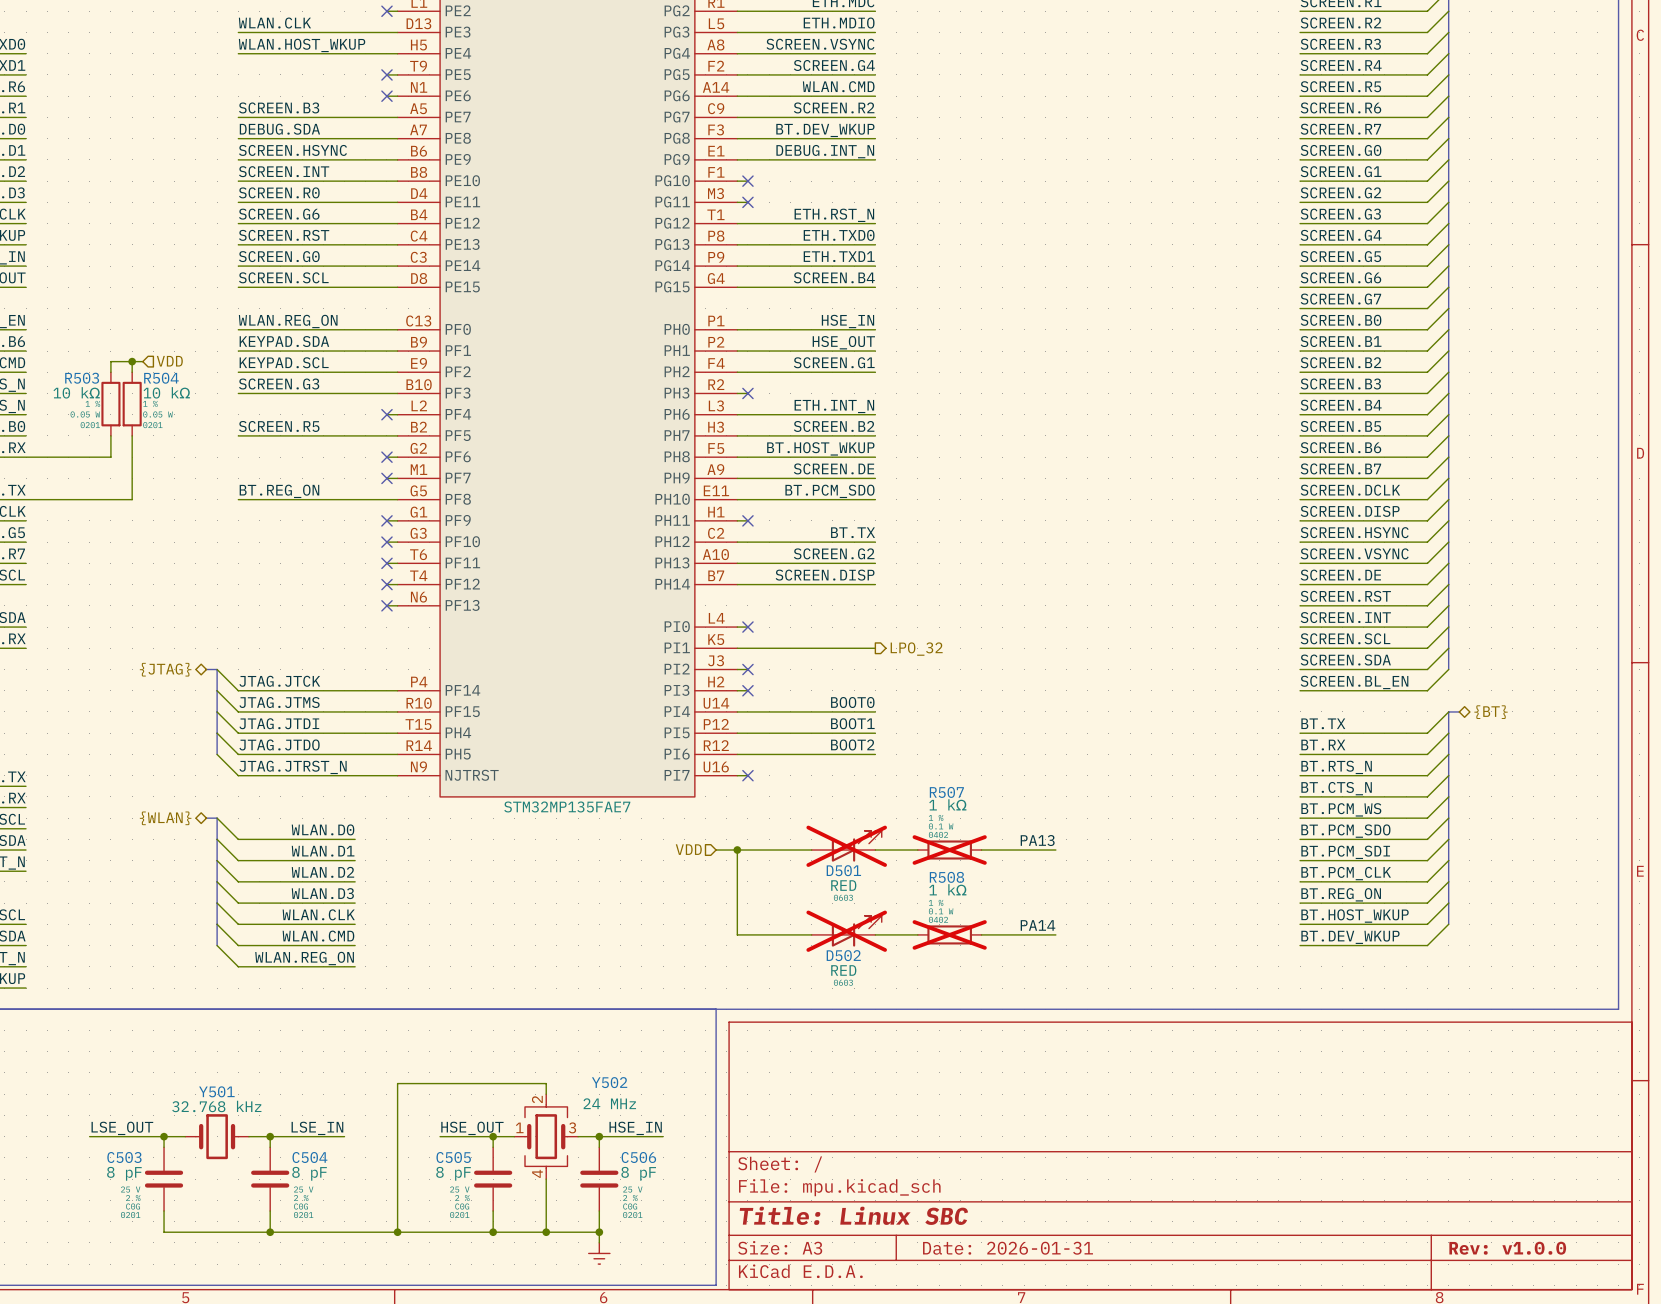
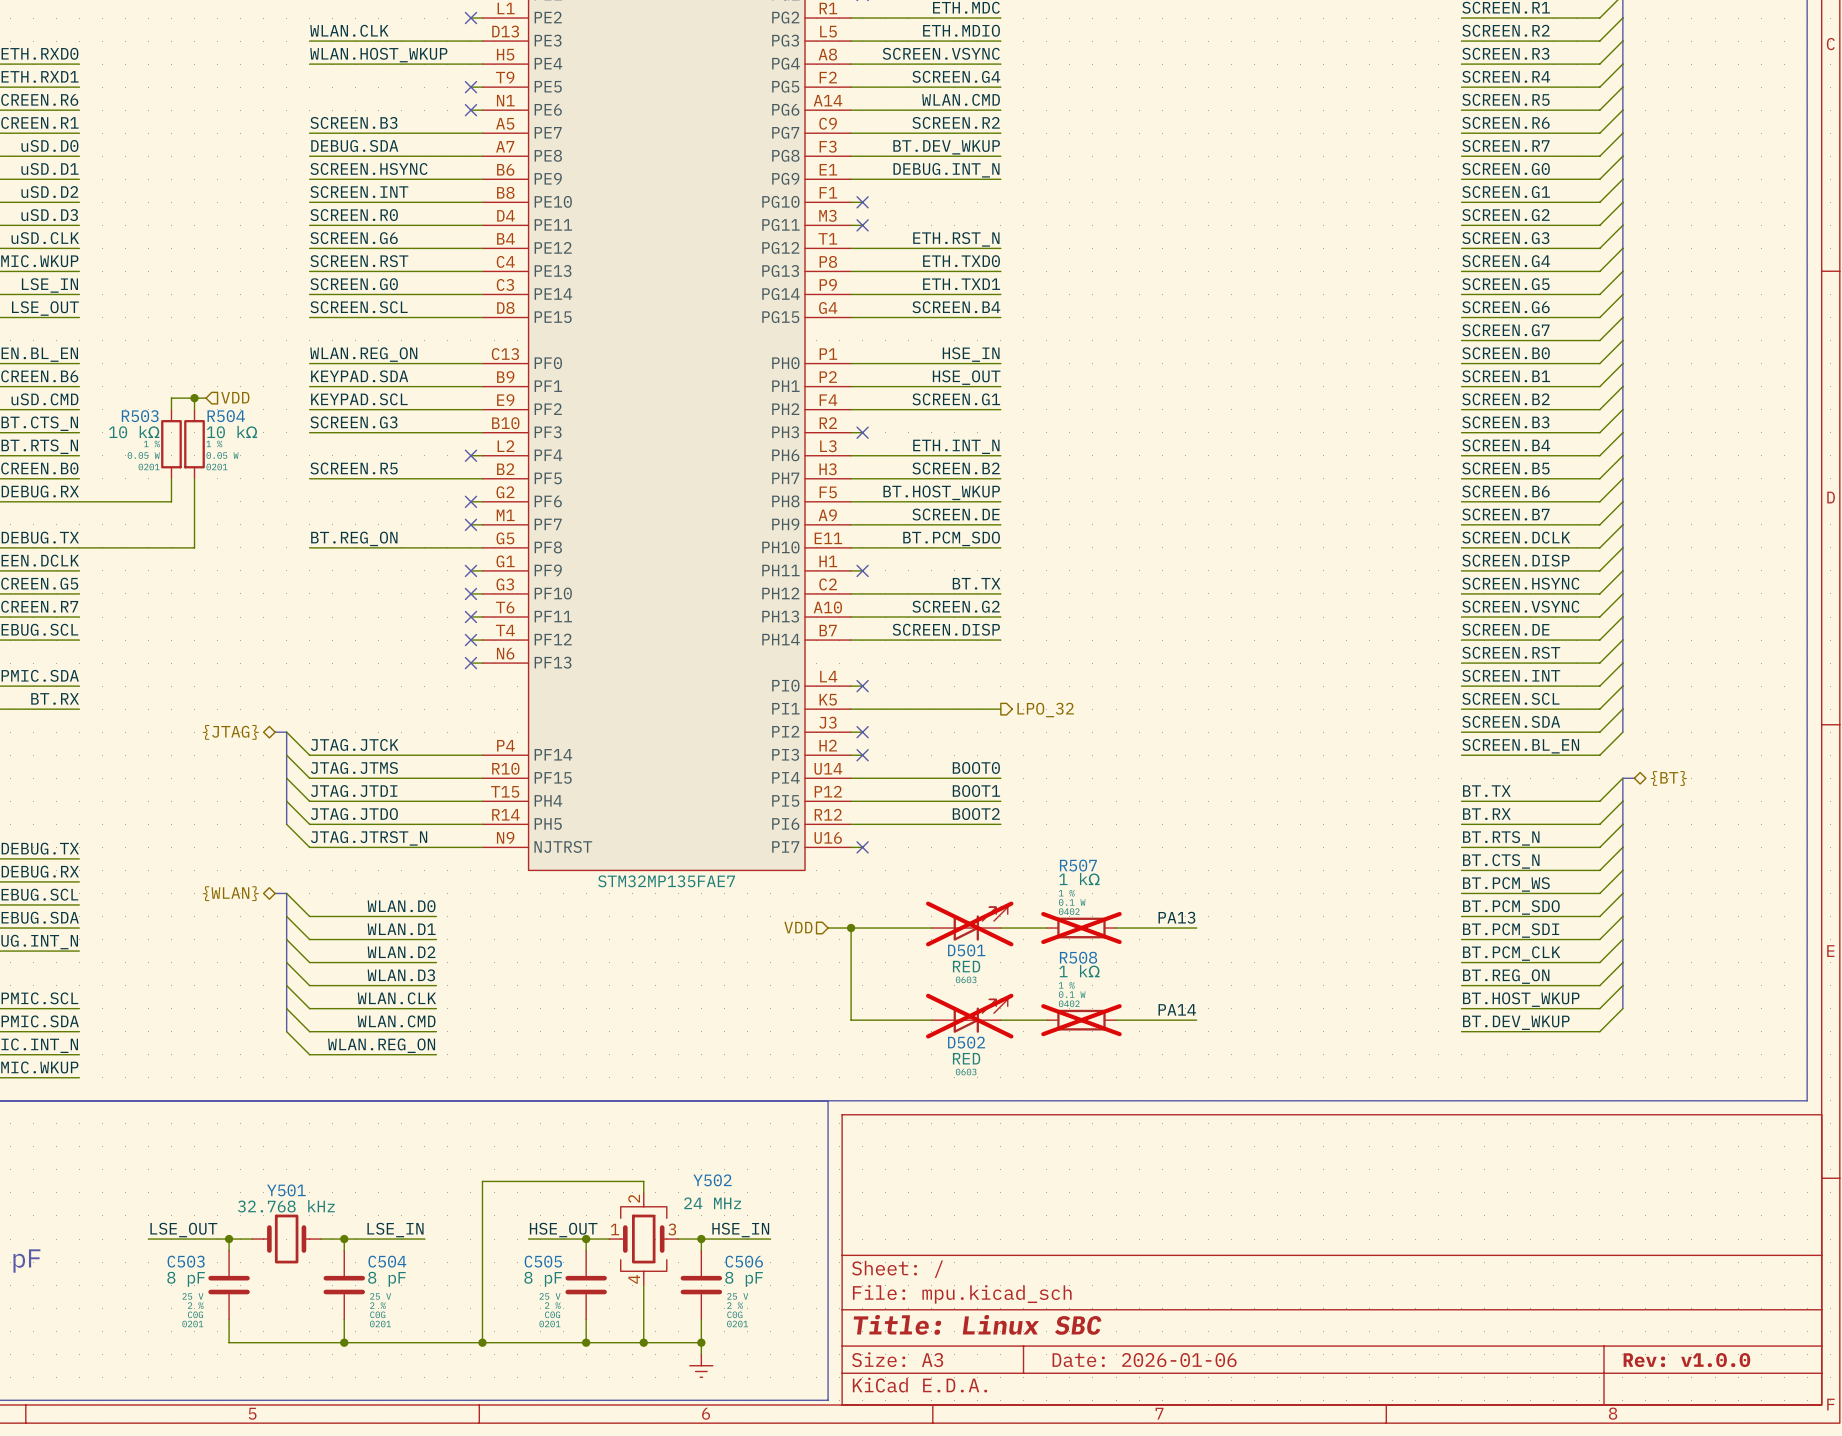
title block: Date: 2026-01-31 (1008, 1248) -> Date: 2026-01-06 (1144, 1360)

